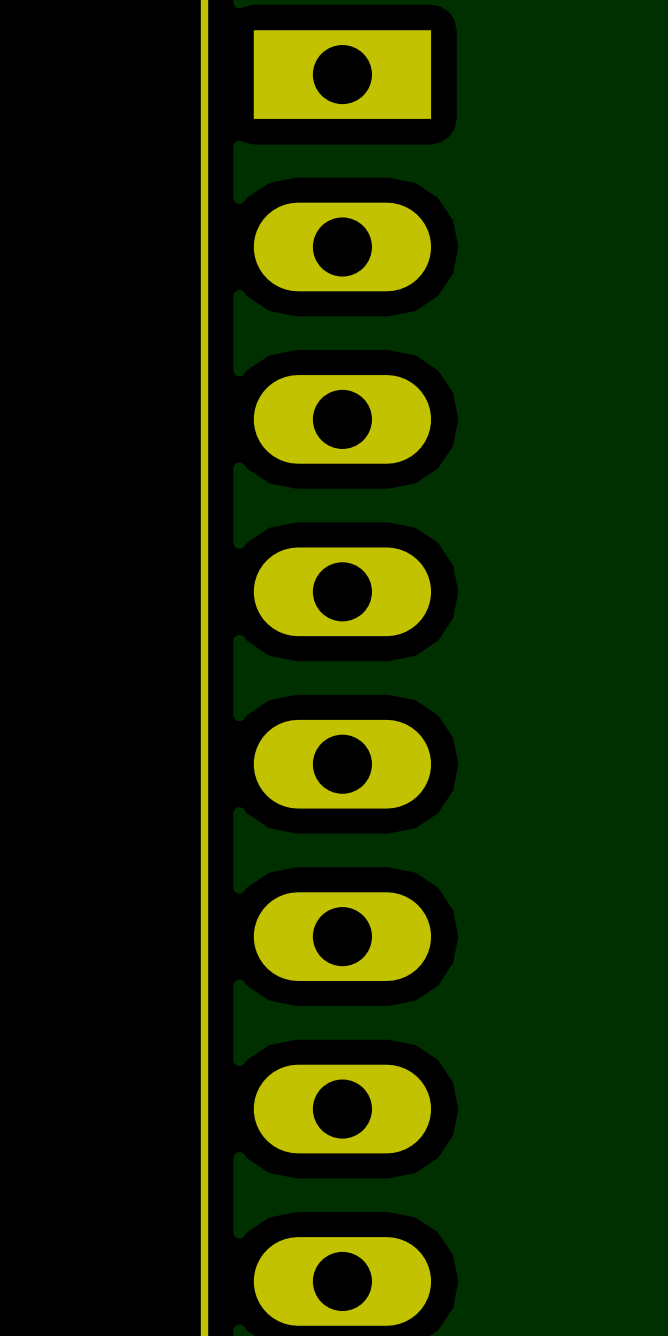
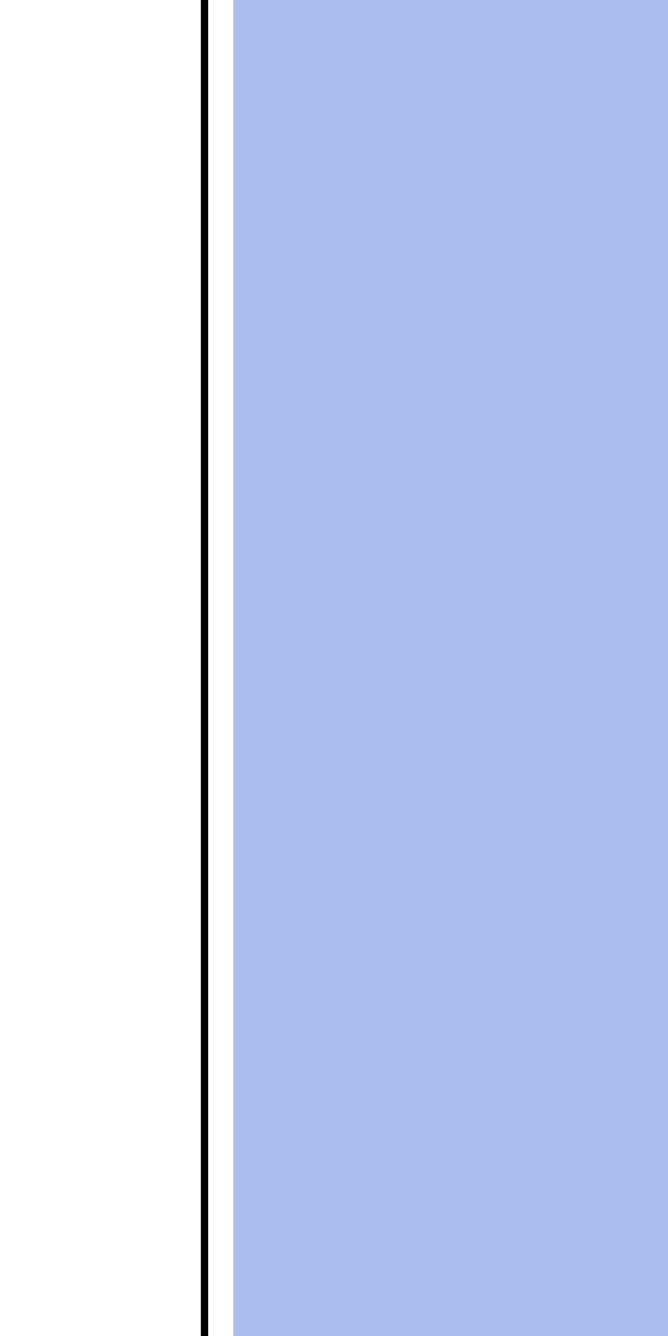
part: (342, 678) -> none

